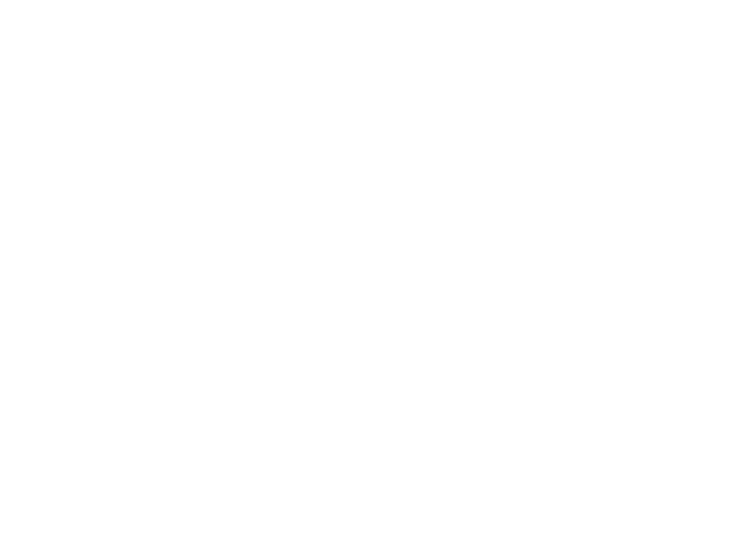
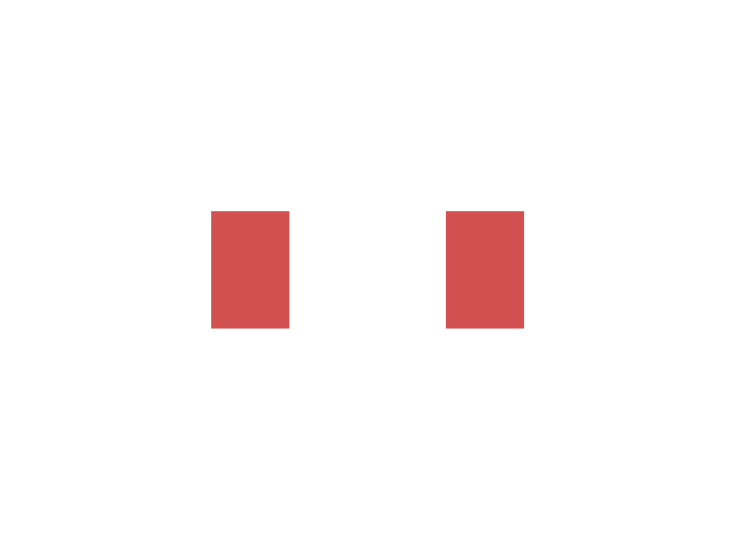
part: none -> (367, 269)

